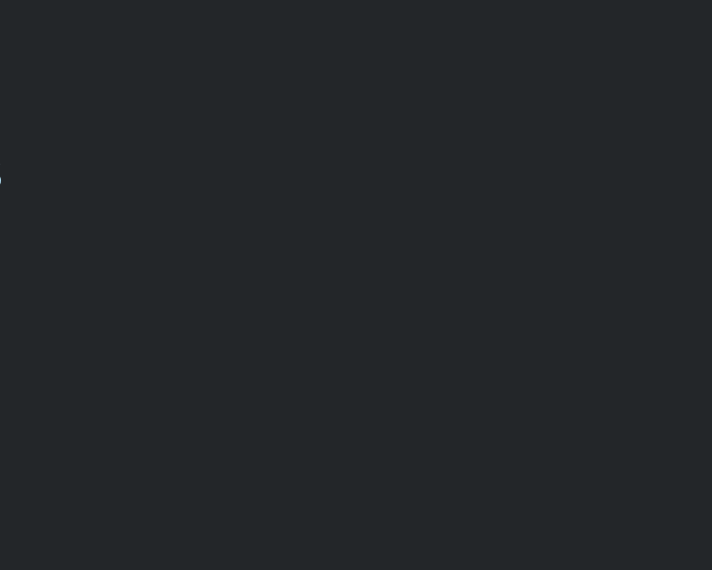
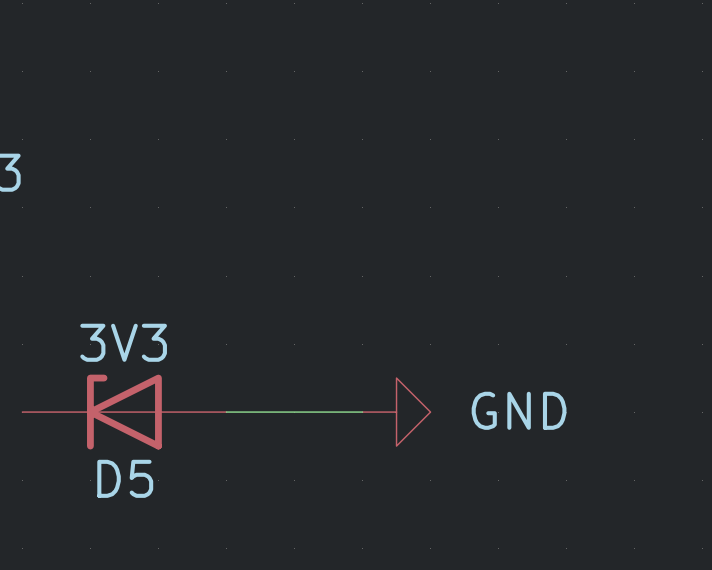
D5: none -> 3V3 (124, 412)
wire: none -> (226, 412) (362, 412)
power symbol: none -> GND (396, 412)

